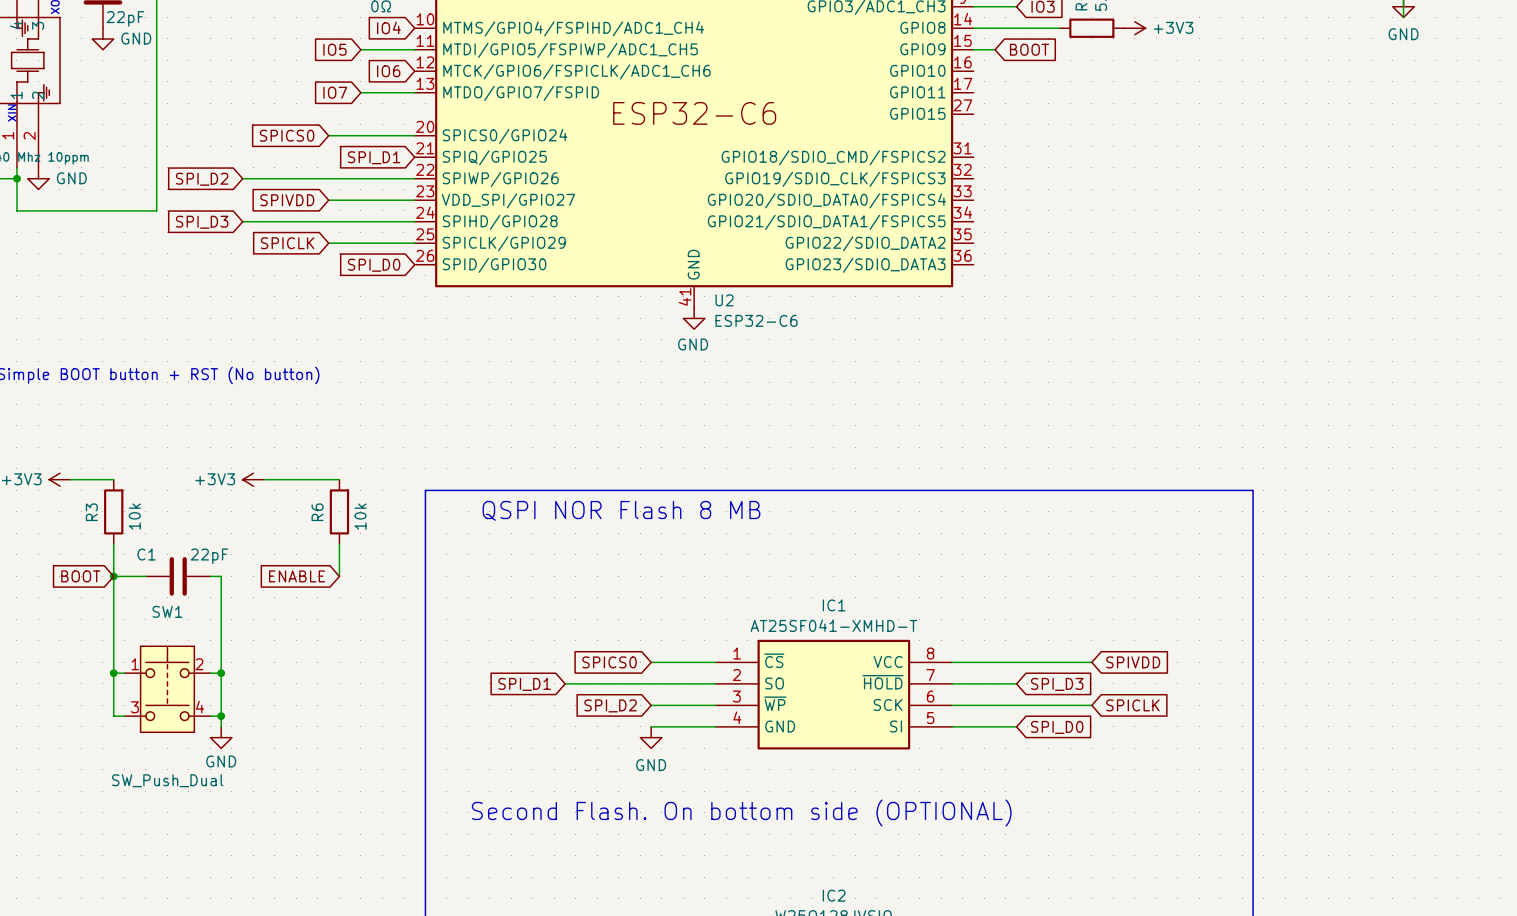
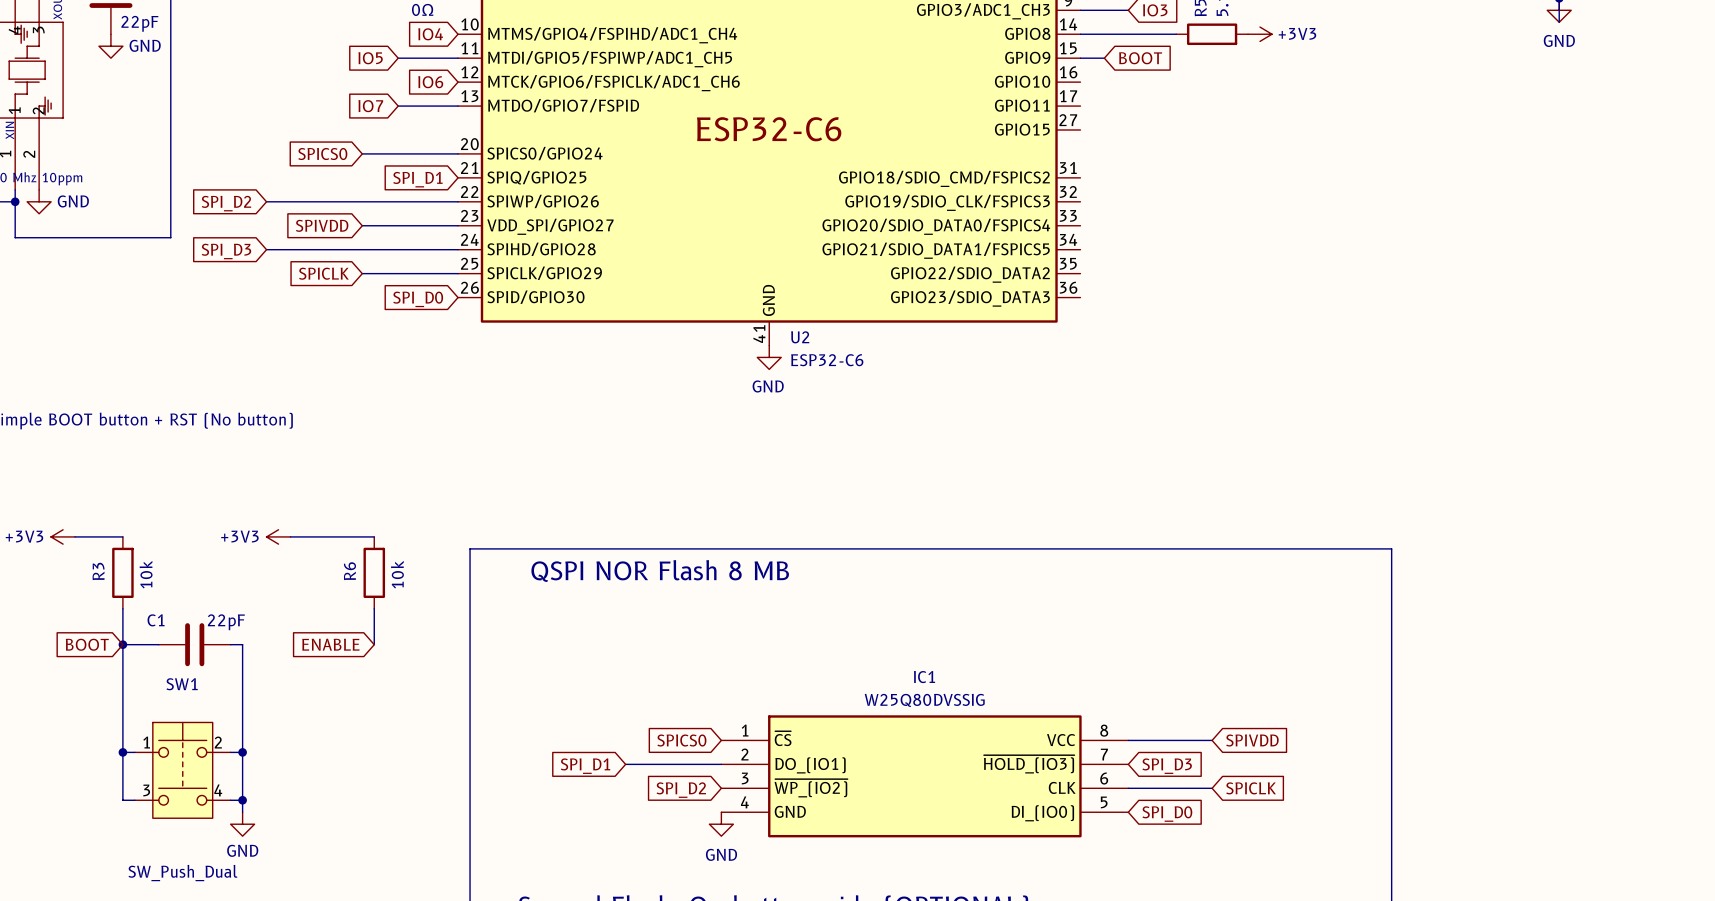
IC1 value: AT25SF041-XMHD-T (833, 625) -> W25Q80DVSSIG (924, 700)
IC1 symbol: [715, 639, 953, 750] -> [721, 715, 1129, 838]

